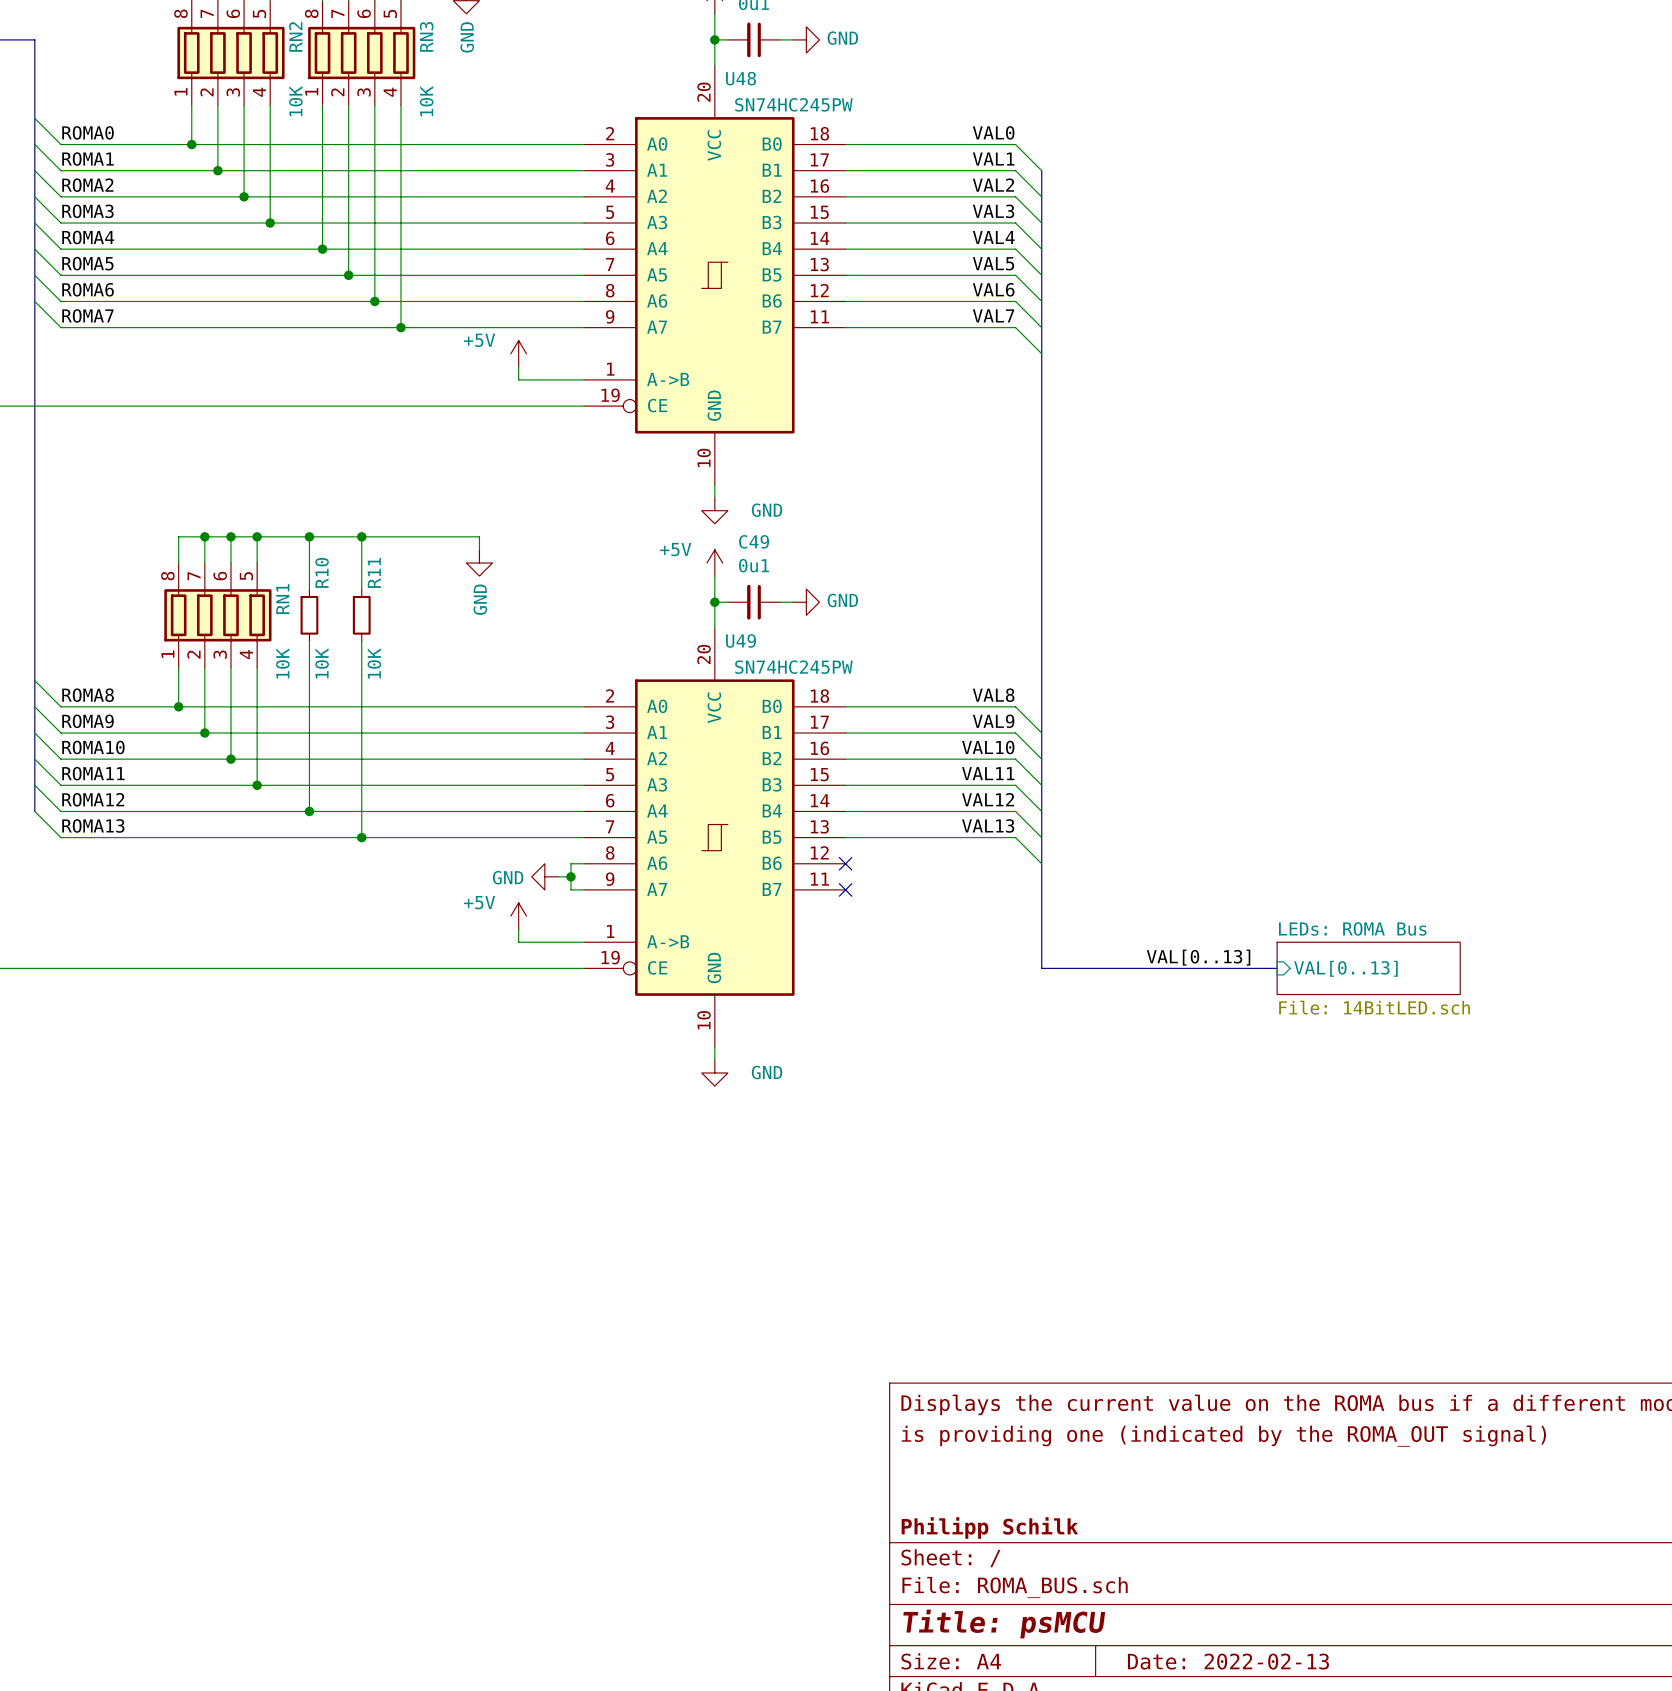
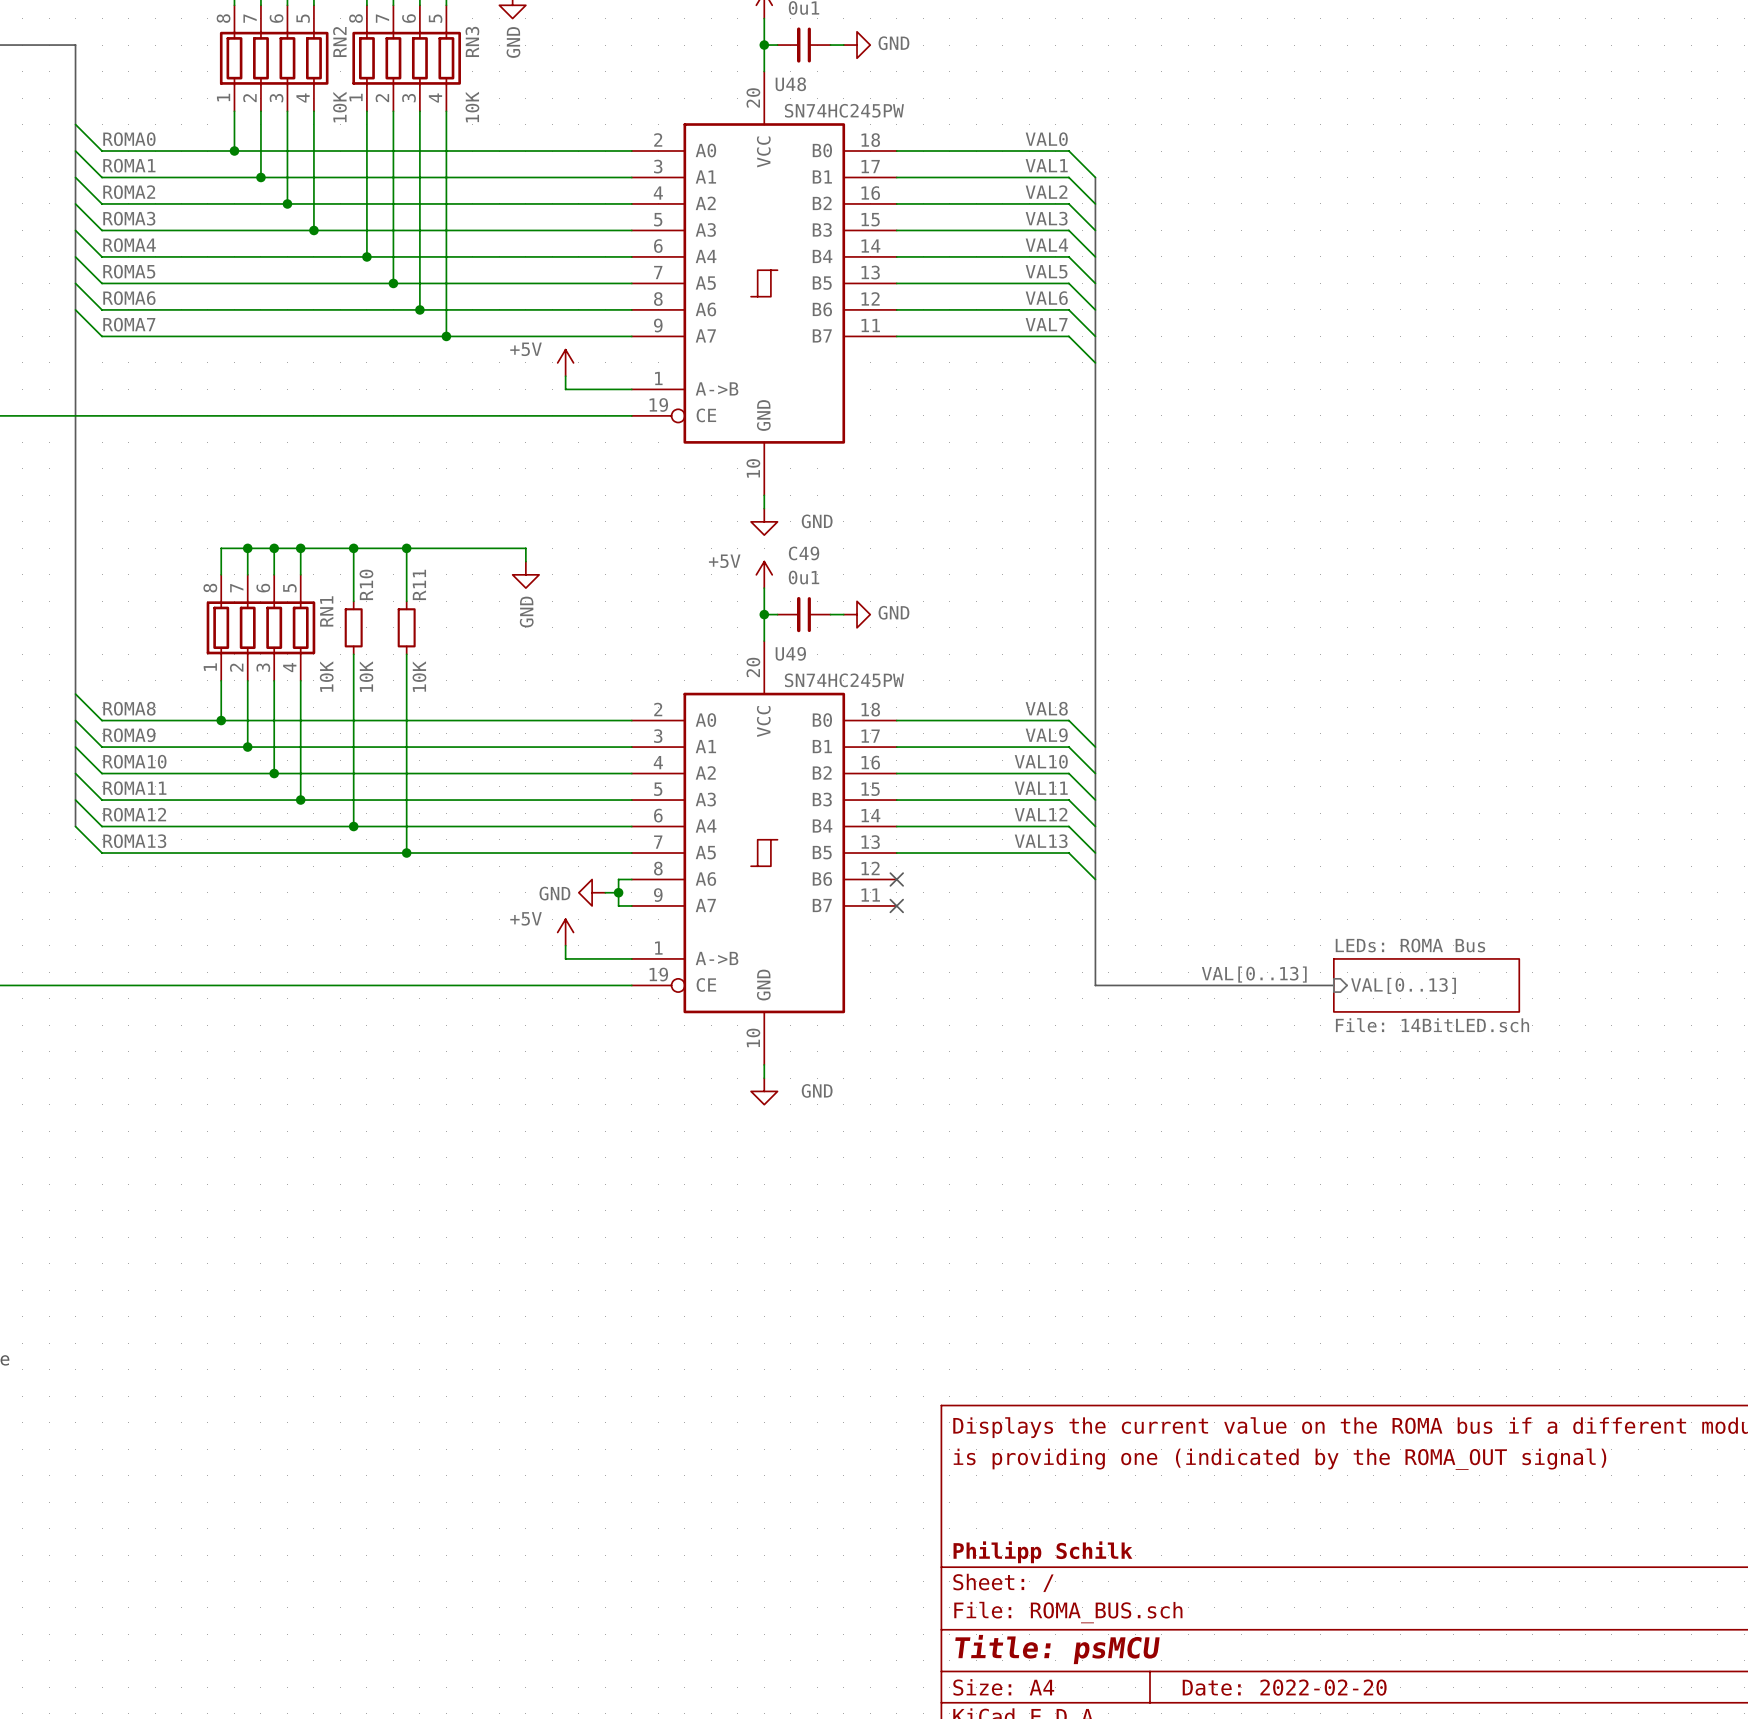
title block: Date: 2022-02-13 (1228, 1661) -> Date: 2022-02-20 (1284, 1687)

